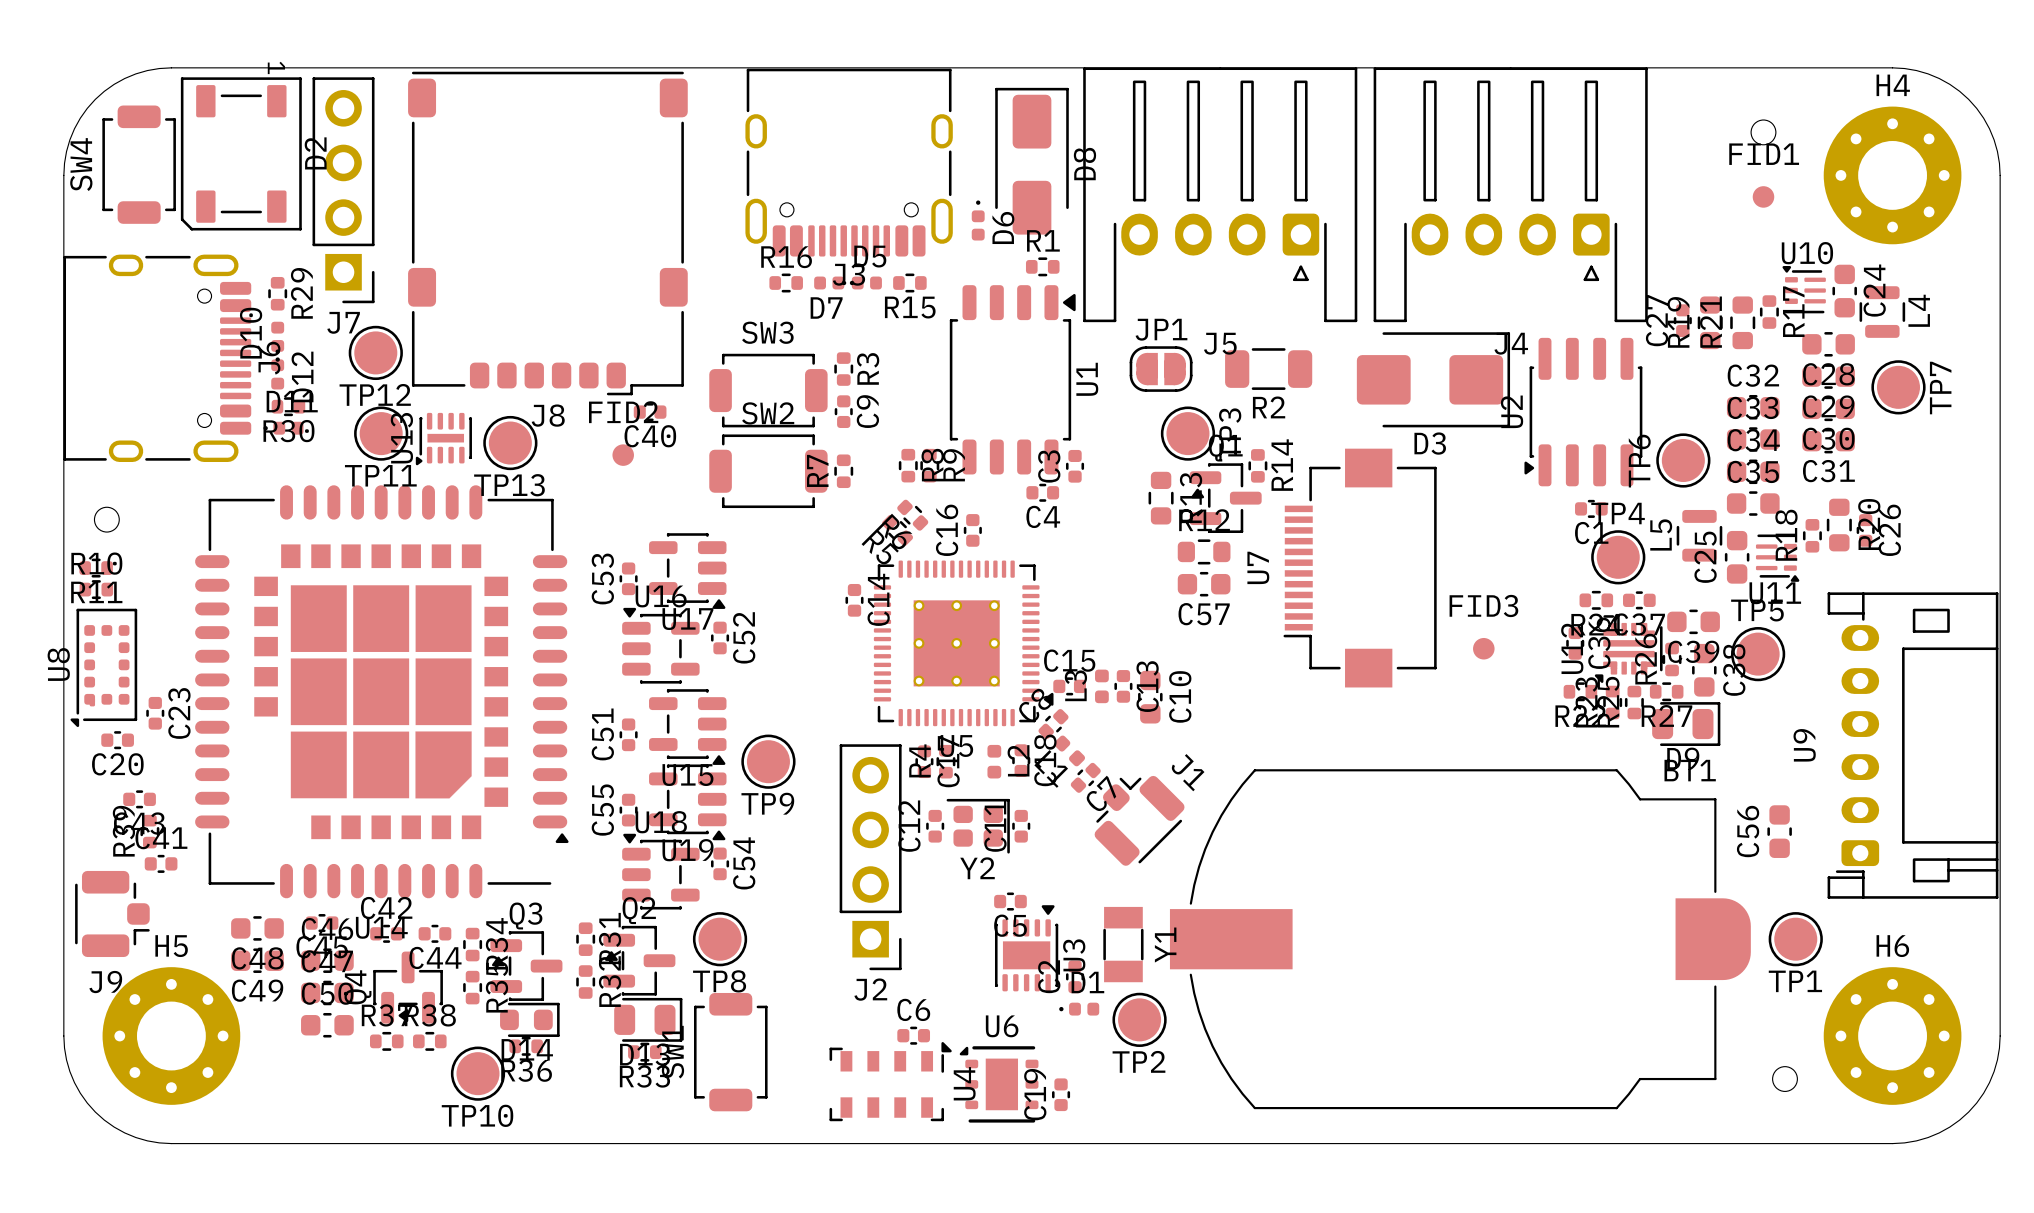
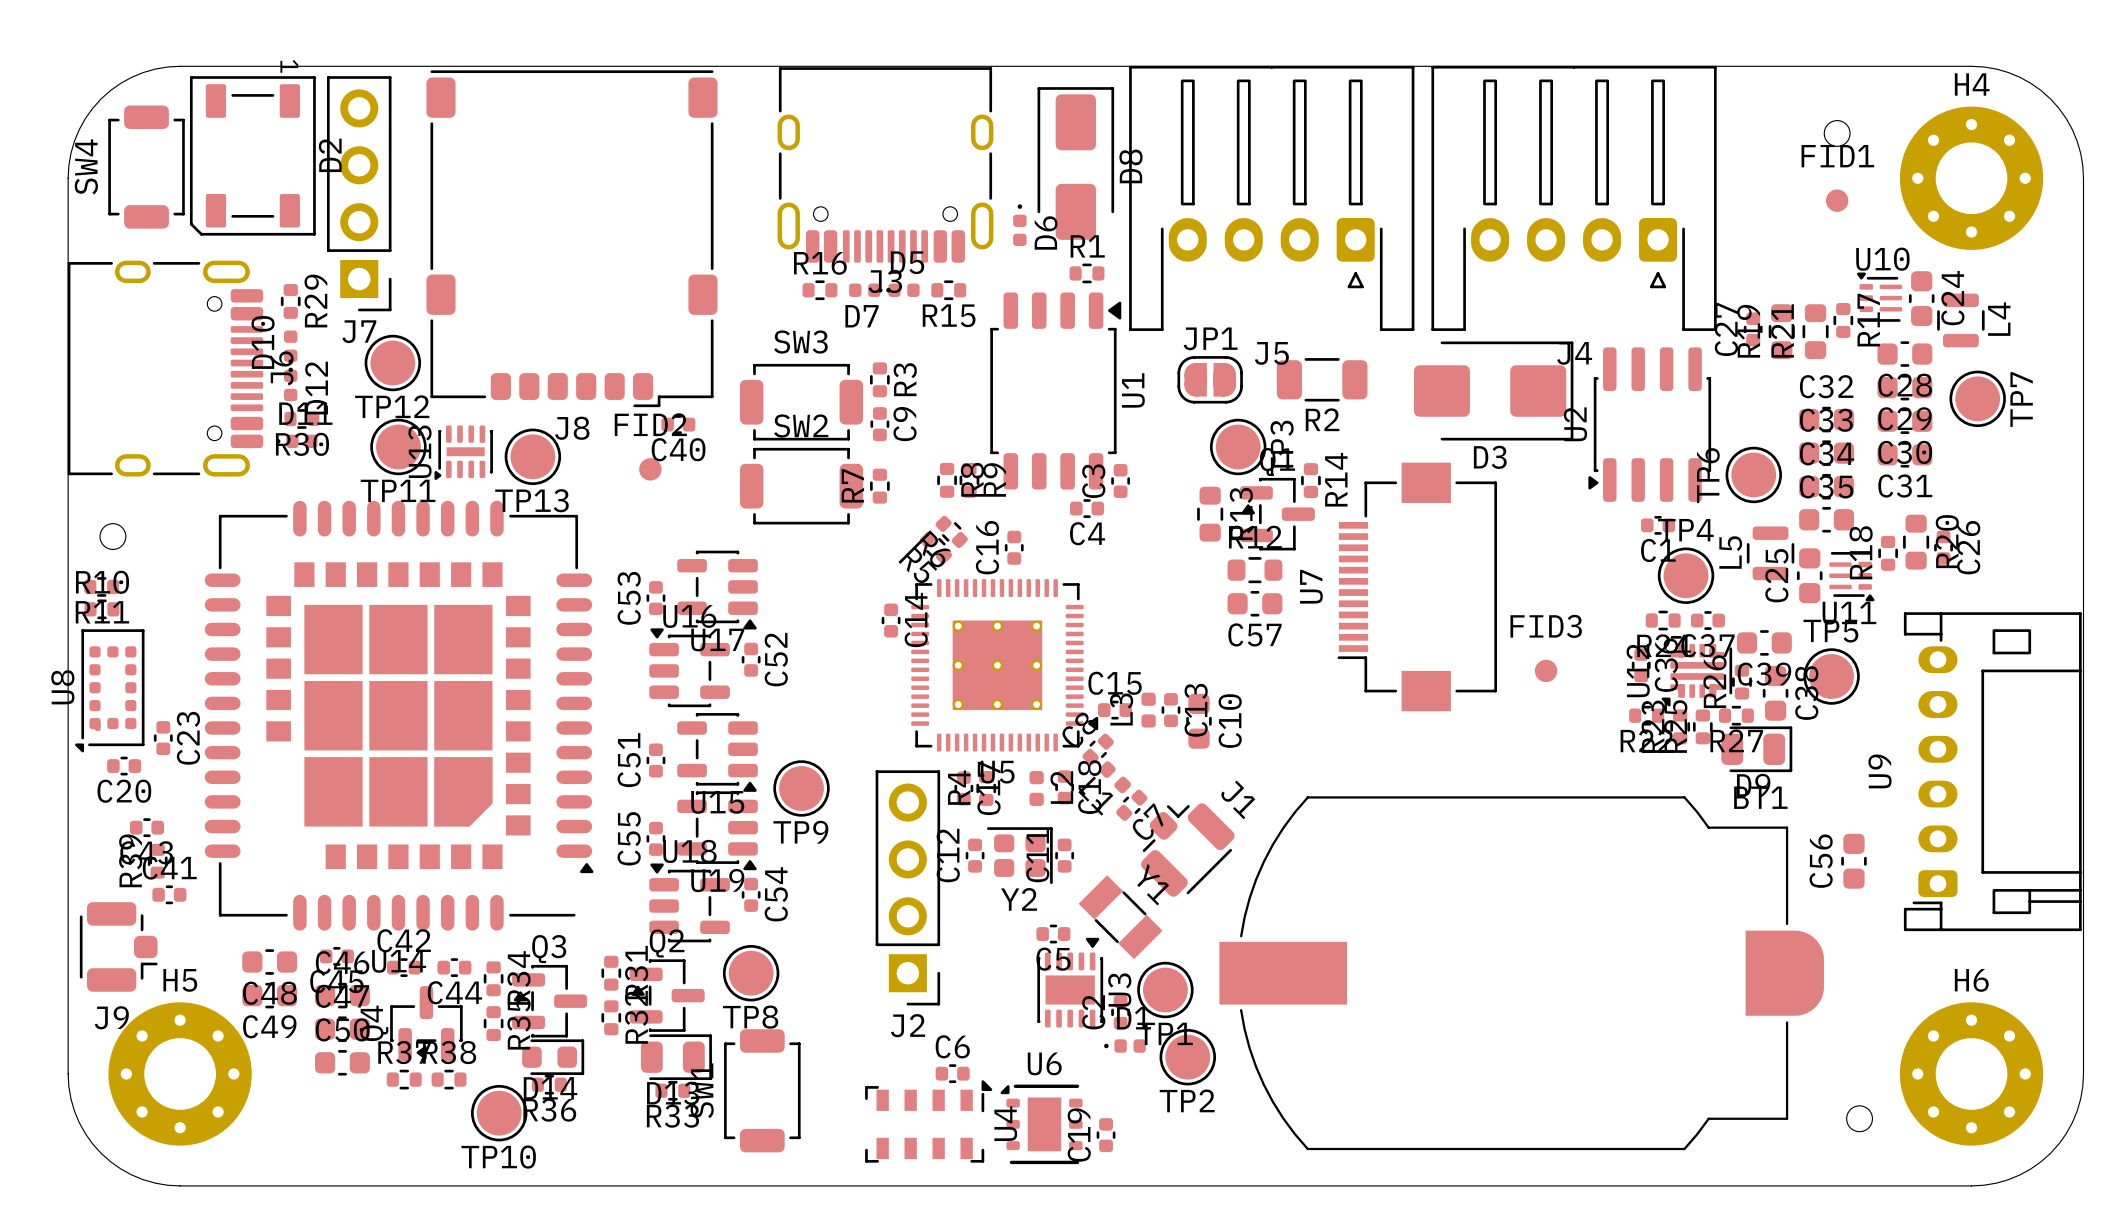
TP1 position: (1795, 939) -> (1165, 990)
Y1 rotation: 0° (1123, 944) -> 45° counterclockwise (1120, 917)
Y1 position: (1123, 944) -> (1120, 917)

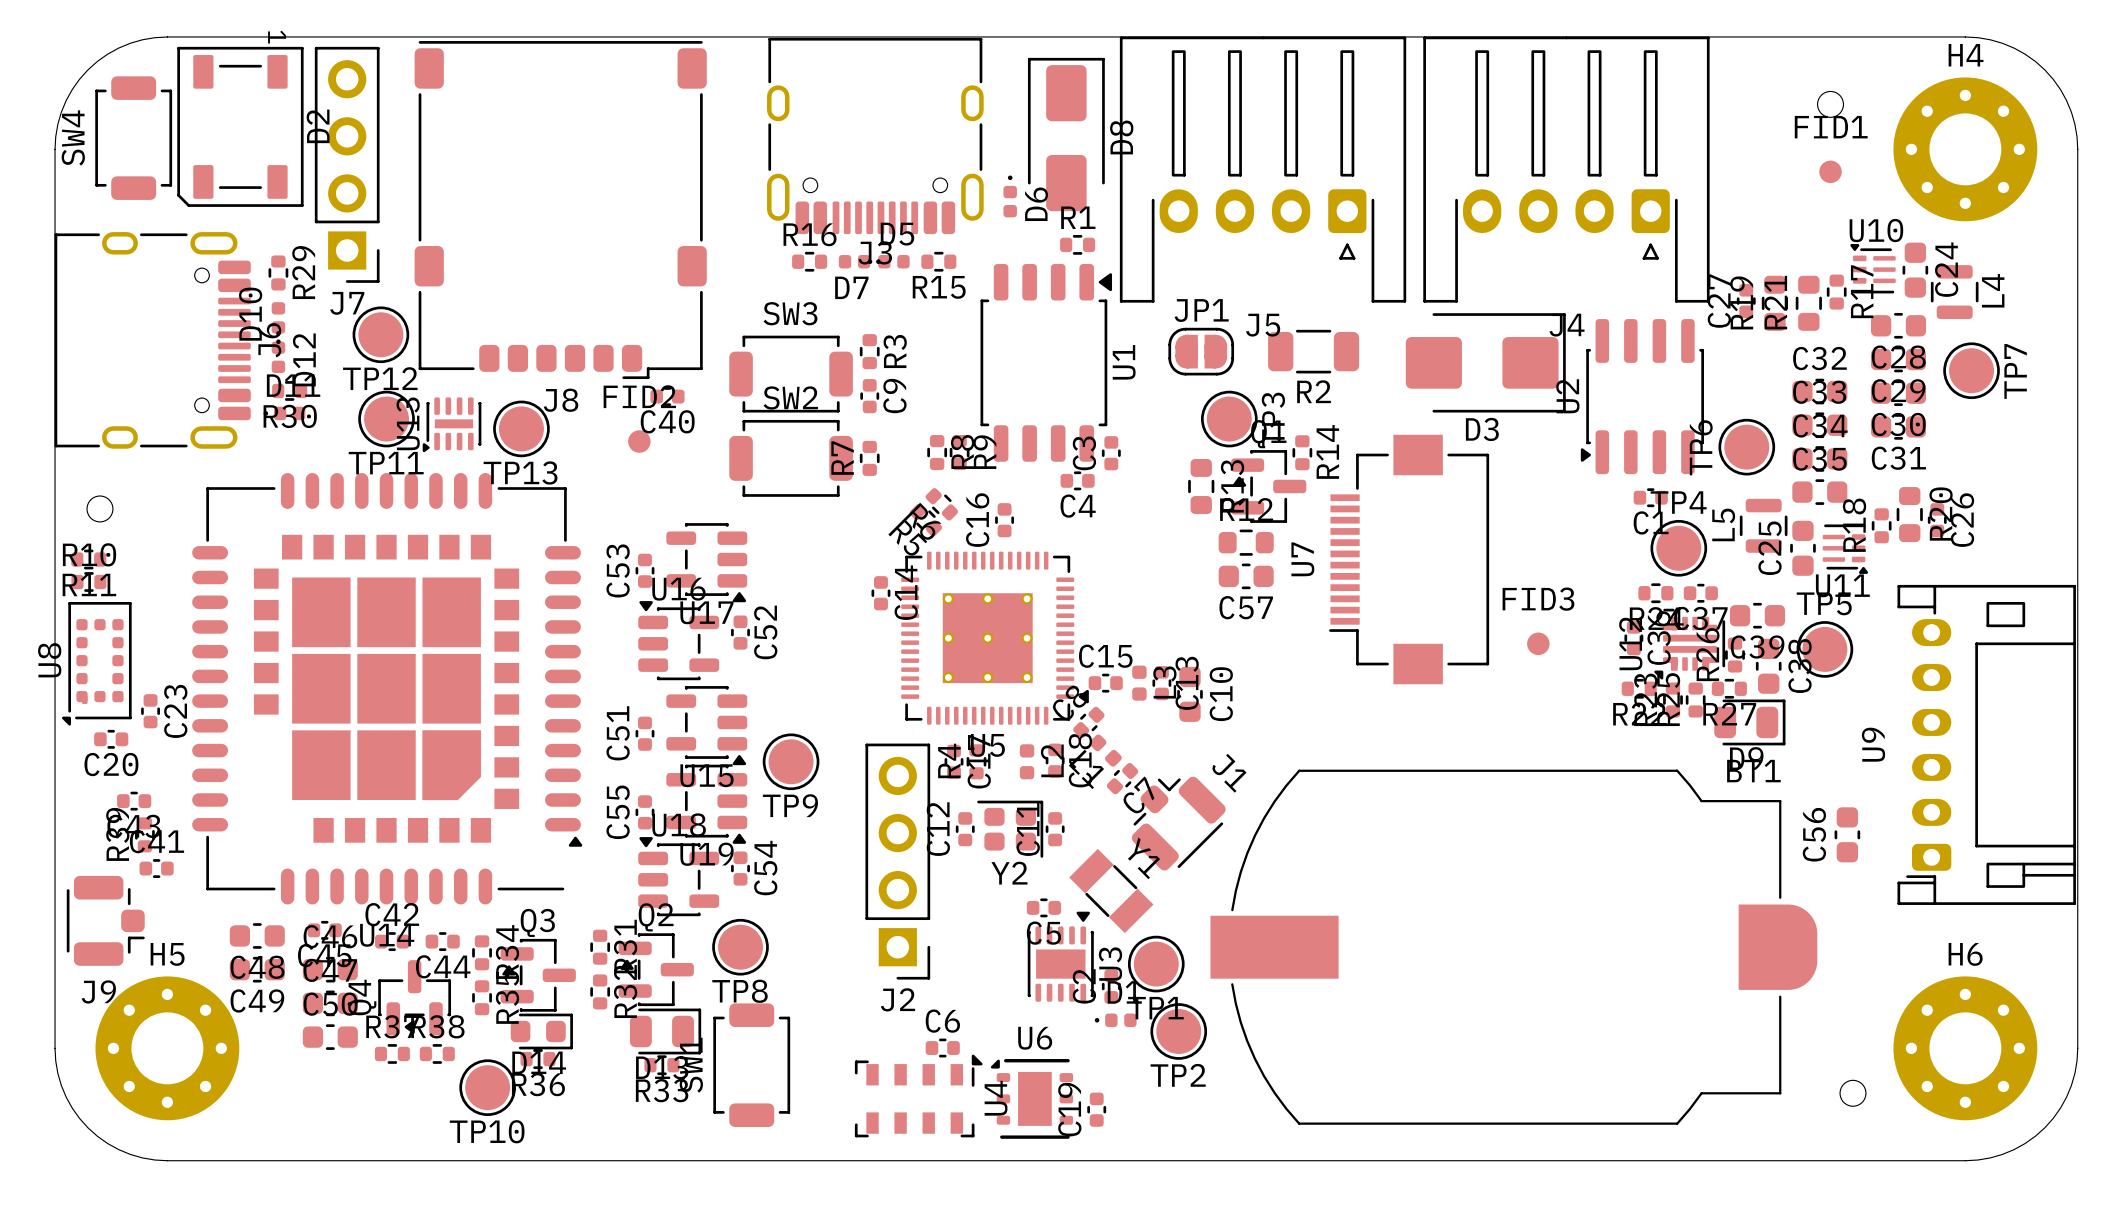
L3 name position: L3 (1121, 709) -> L3 (1164, 682)

